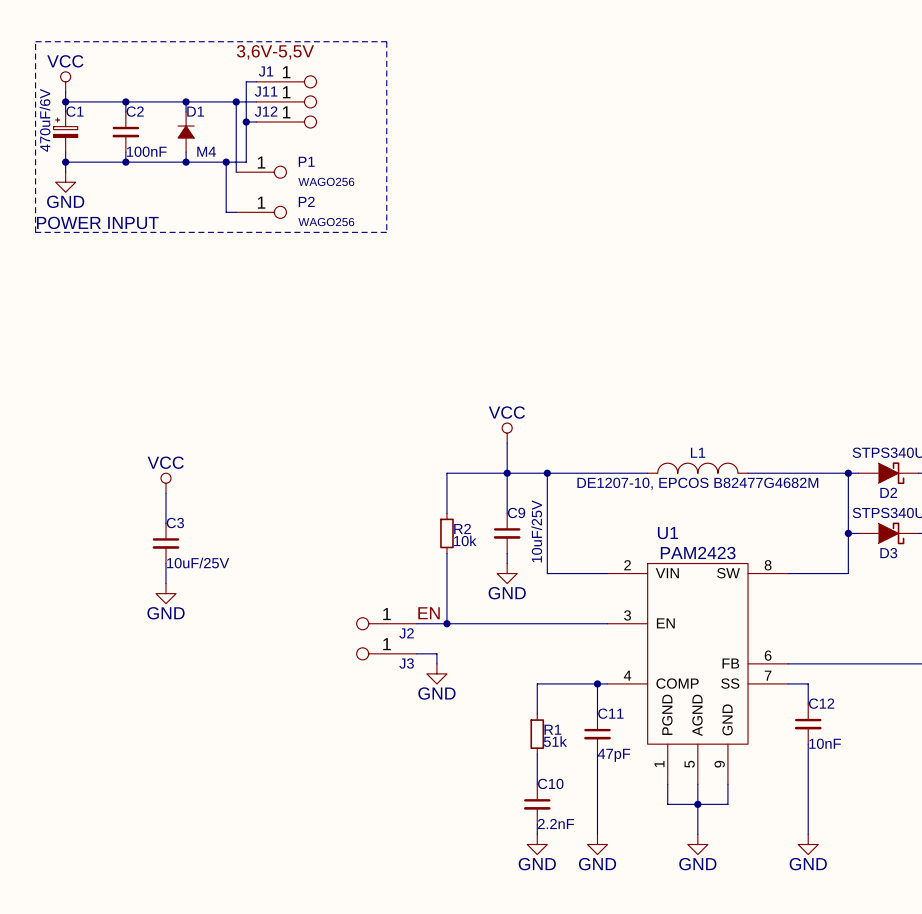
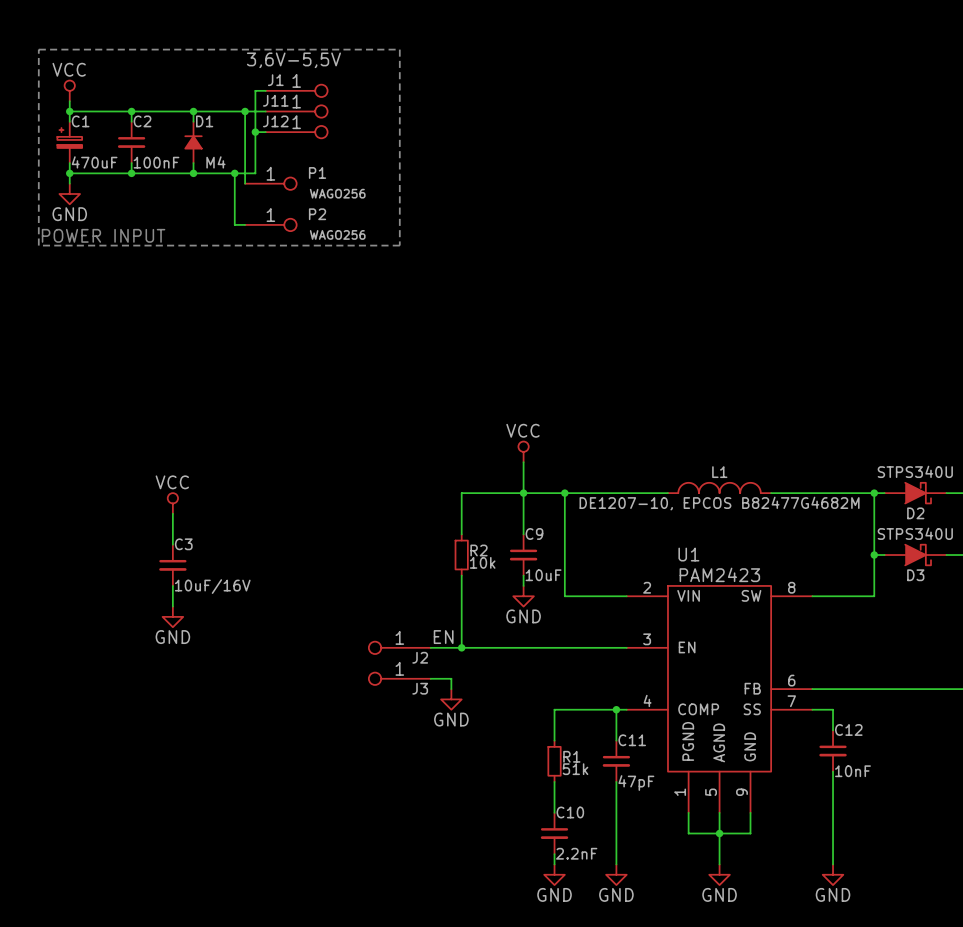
C1 value: 470uF/6V (45, 120) -> 470uF (94, 162)
C9 value: 10uF/25V (536, 531) -> 10uF (543, 575)
C3 value: 10uF/25V (198, 562) -> 10uF/16V (212, 586)

